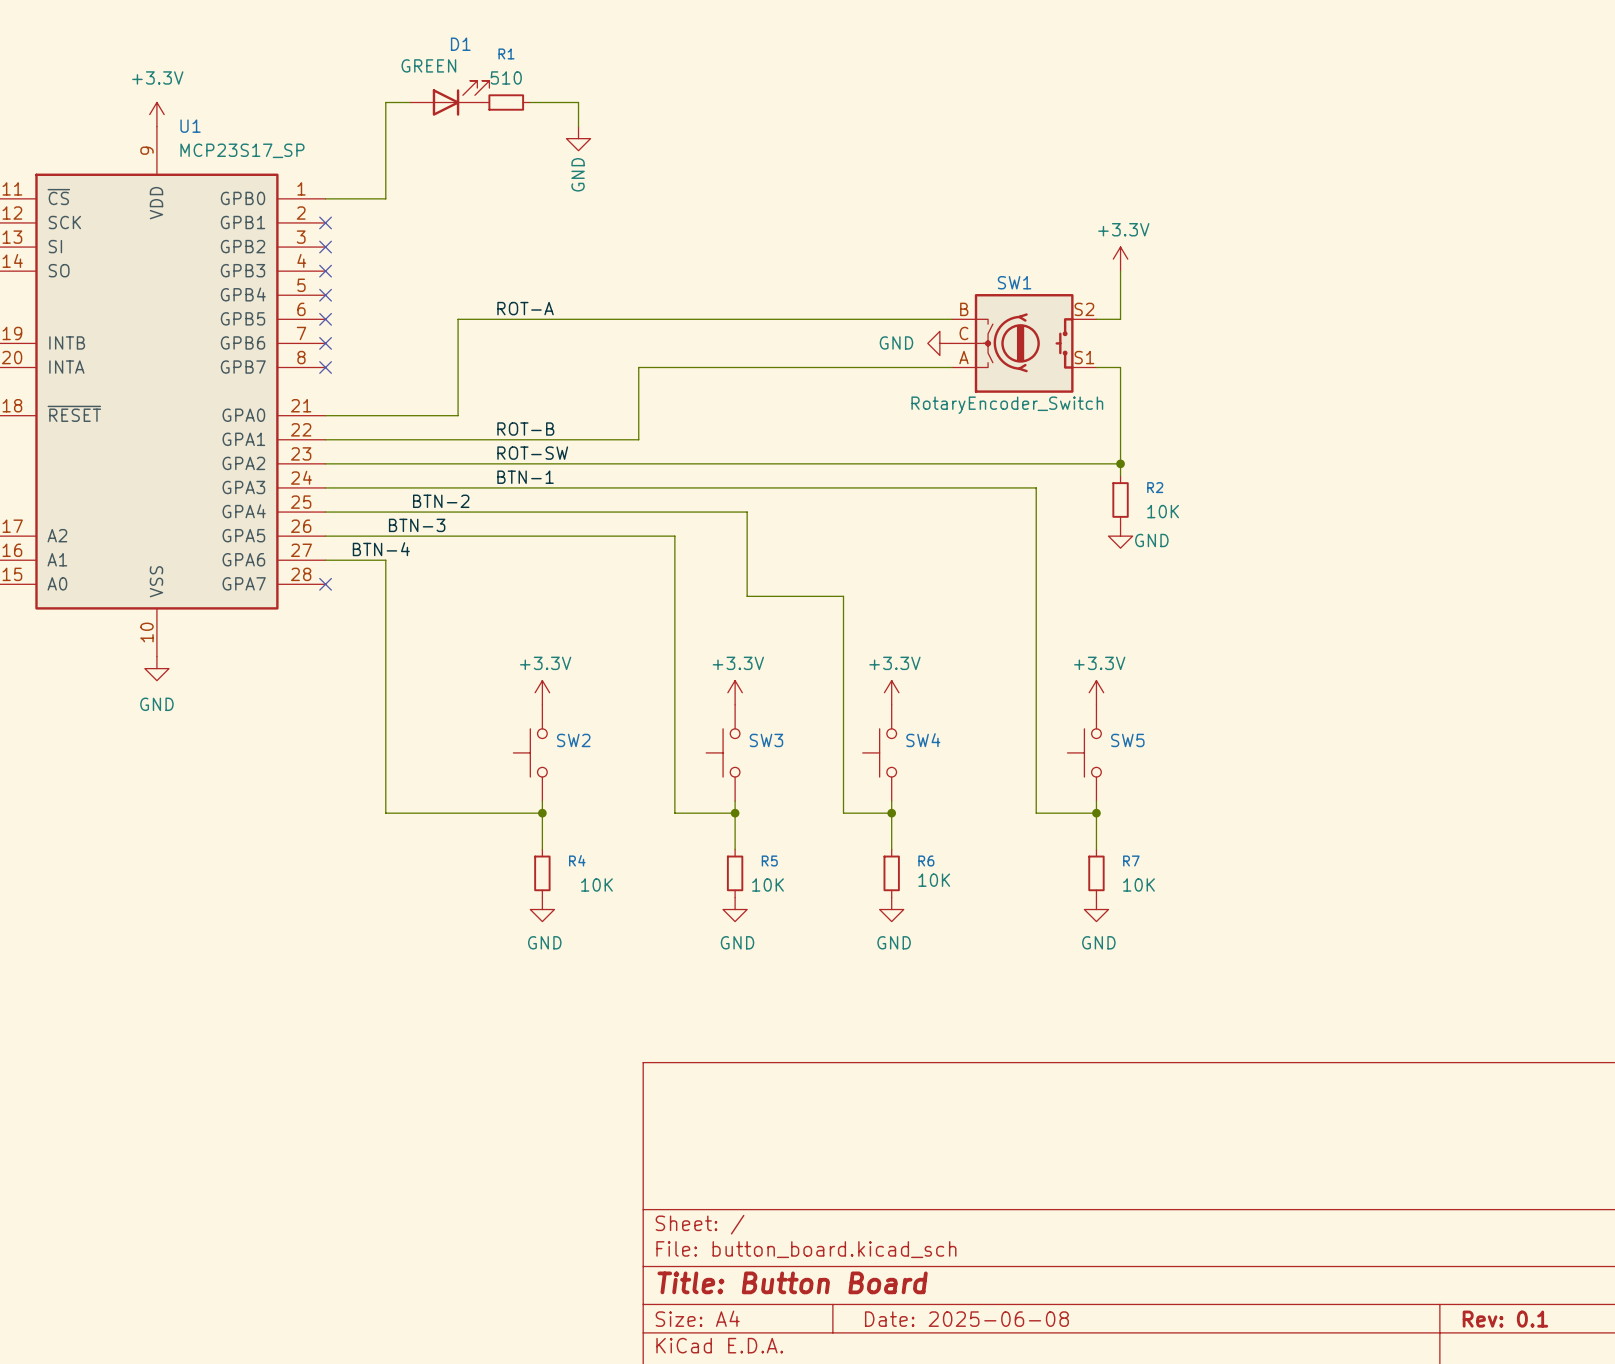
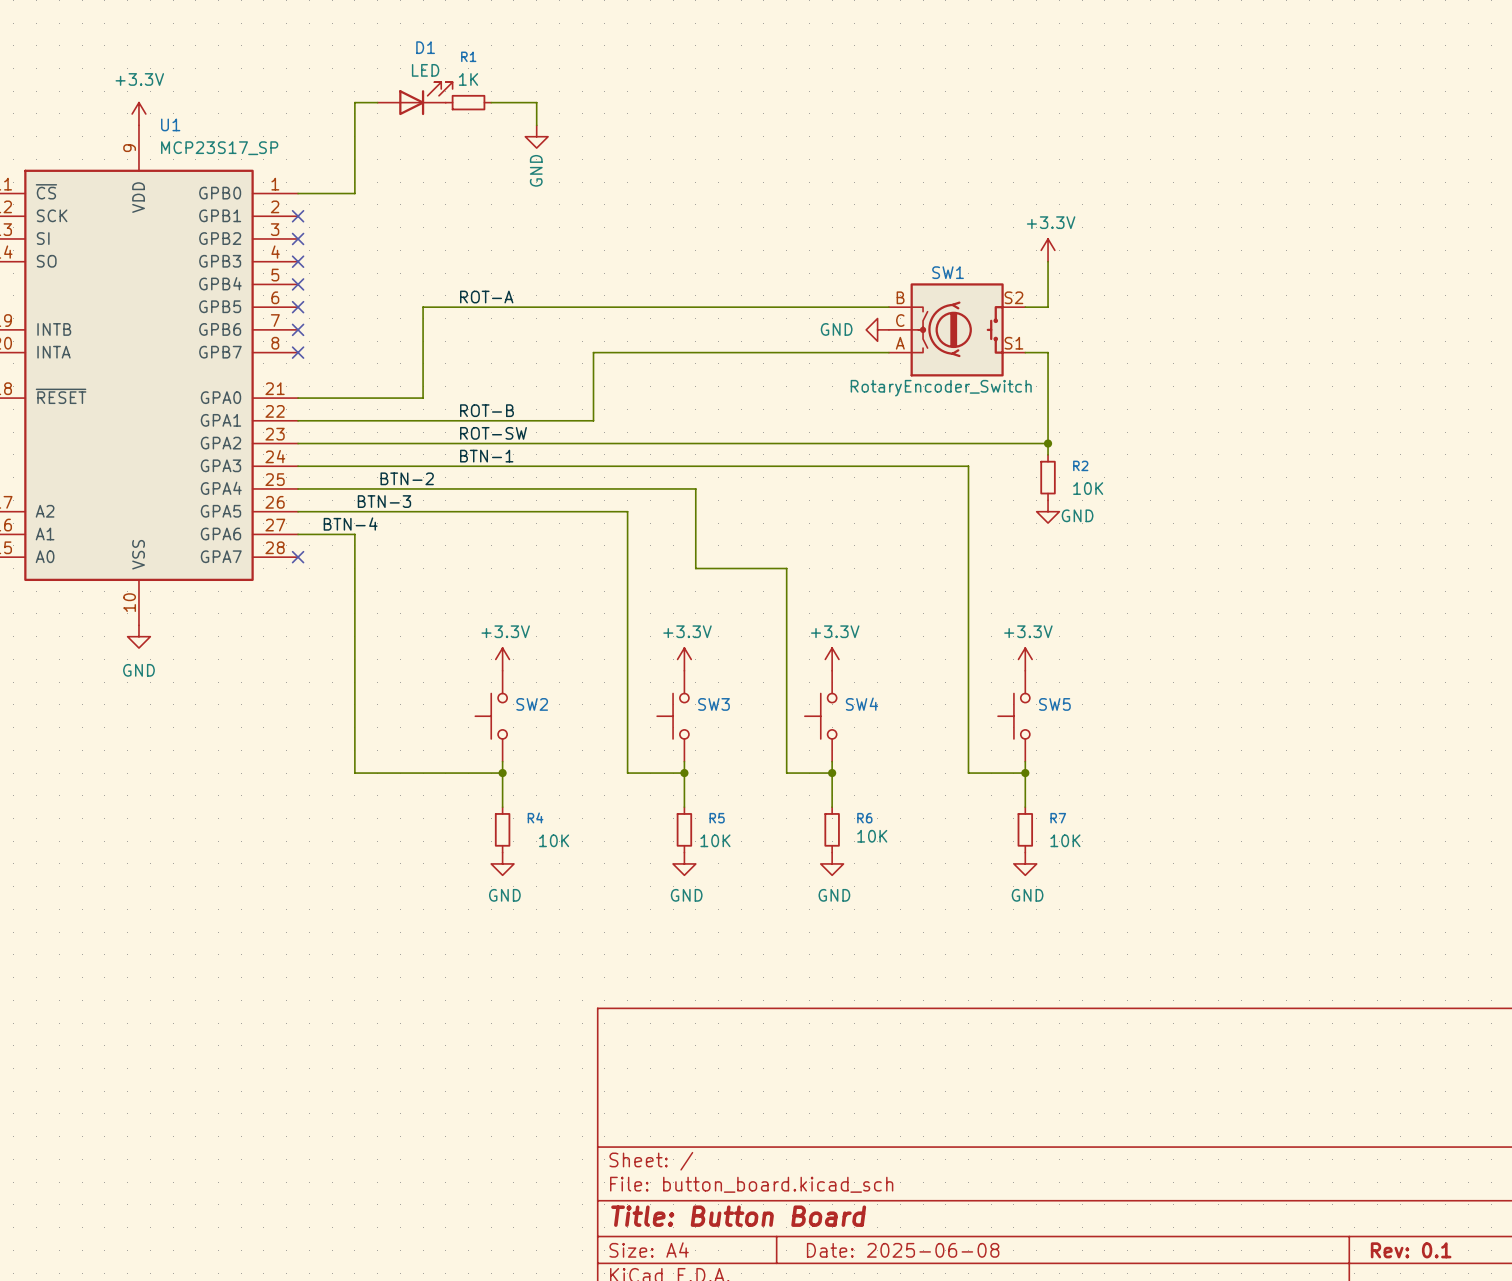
D1 value: GREEN (428, 65) -> LED (425, 70)
R1 value: 510 (506, 77) -> 1K (468, 79)

